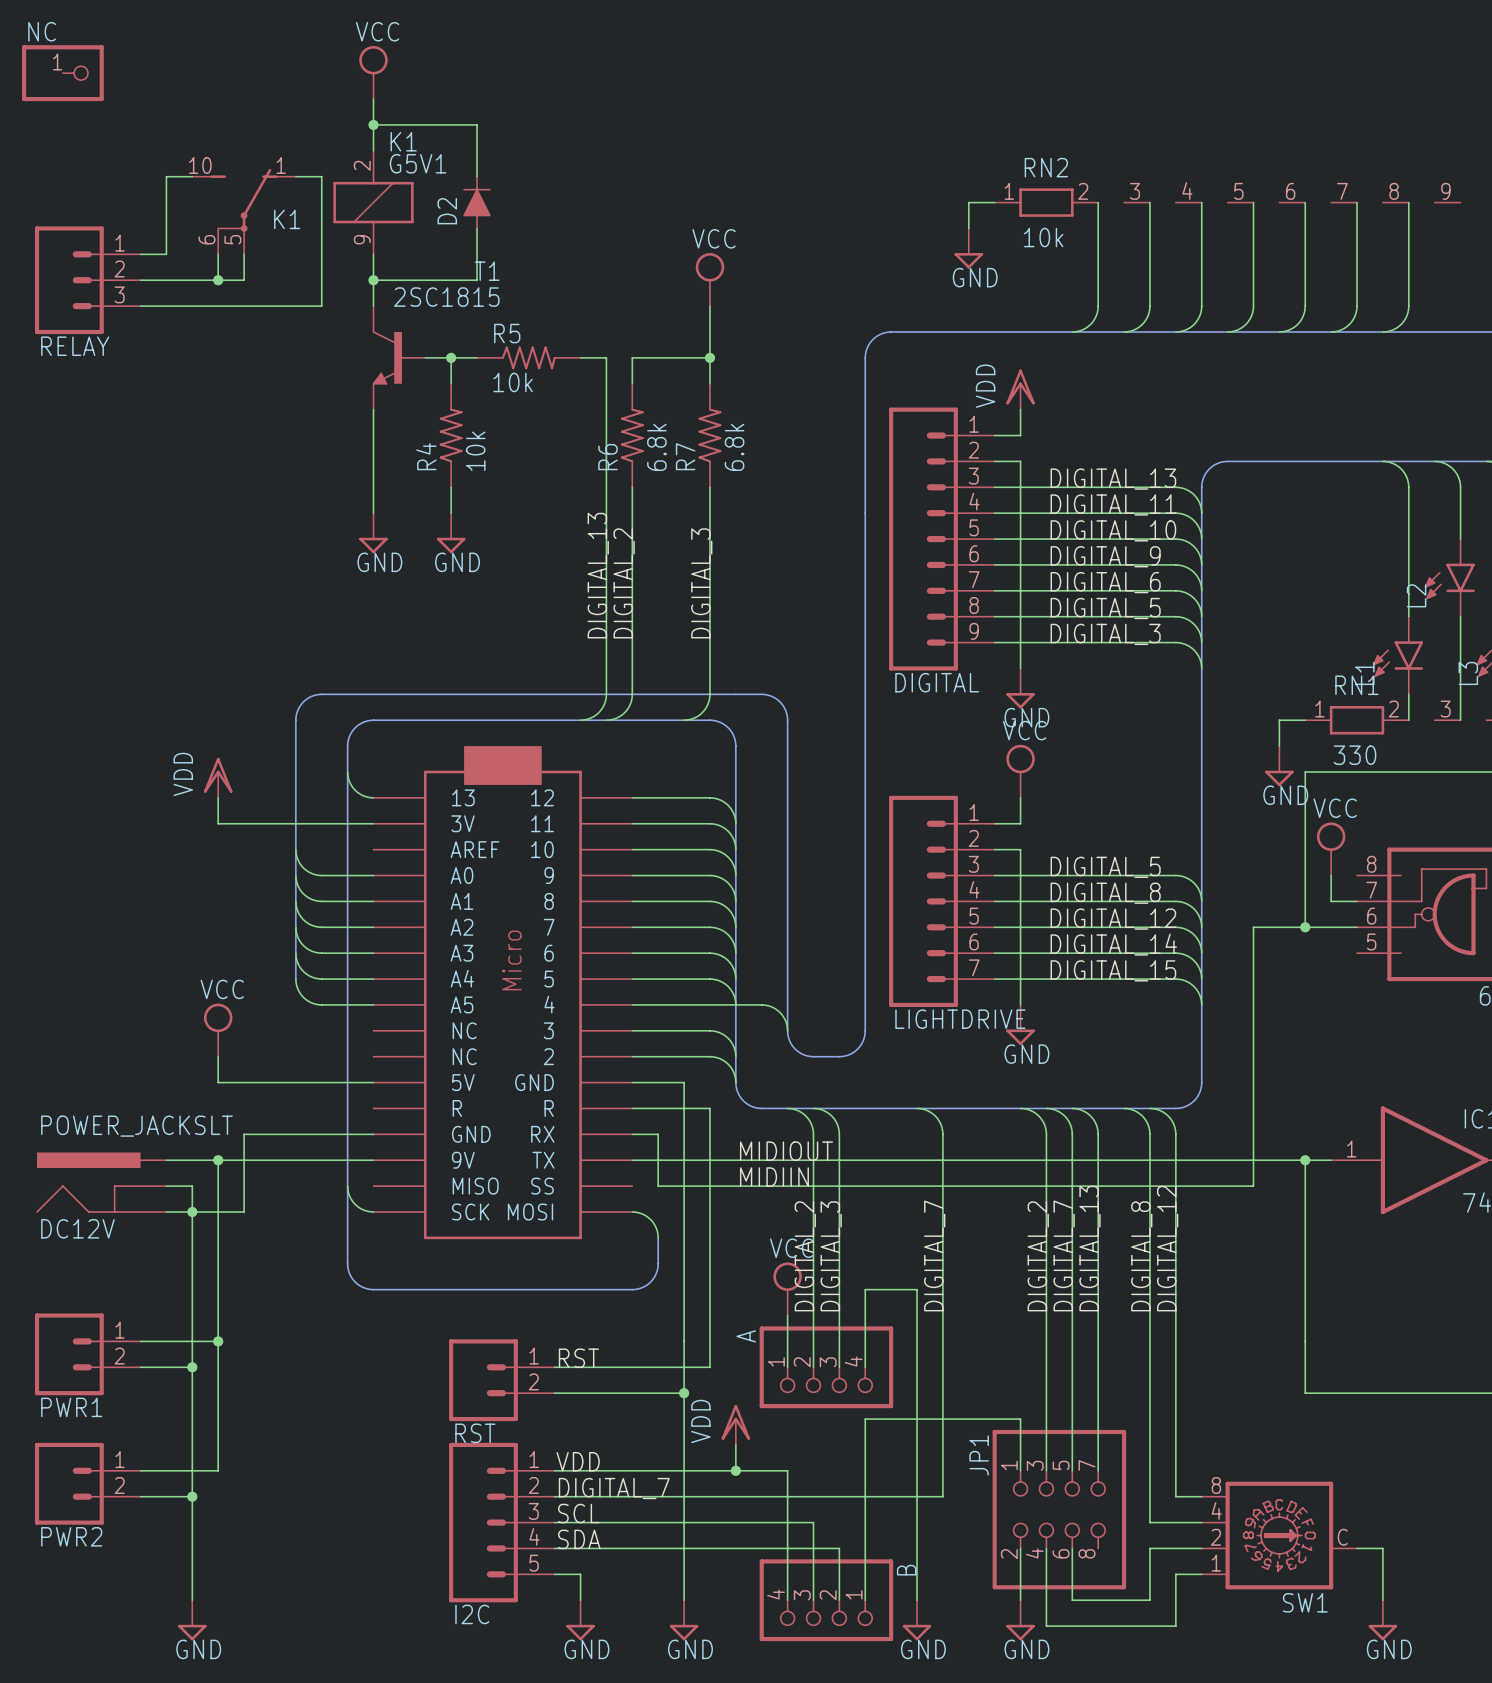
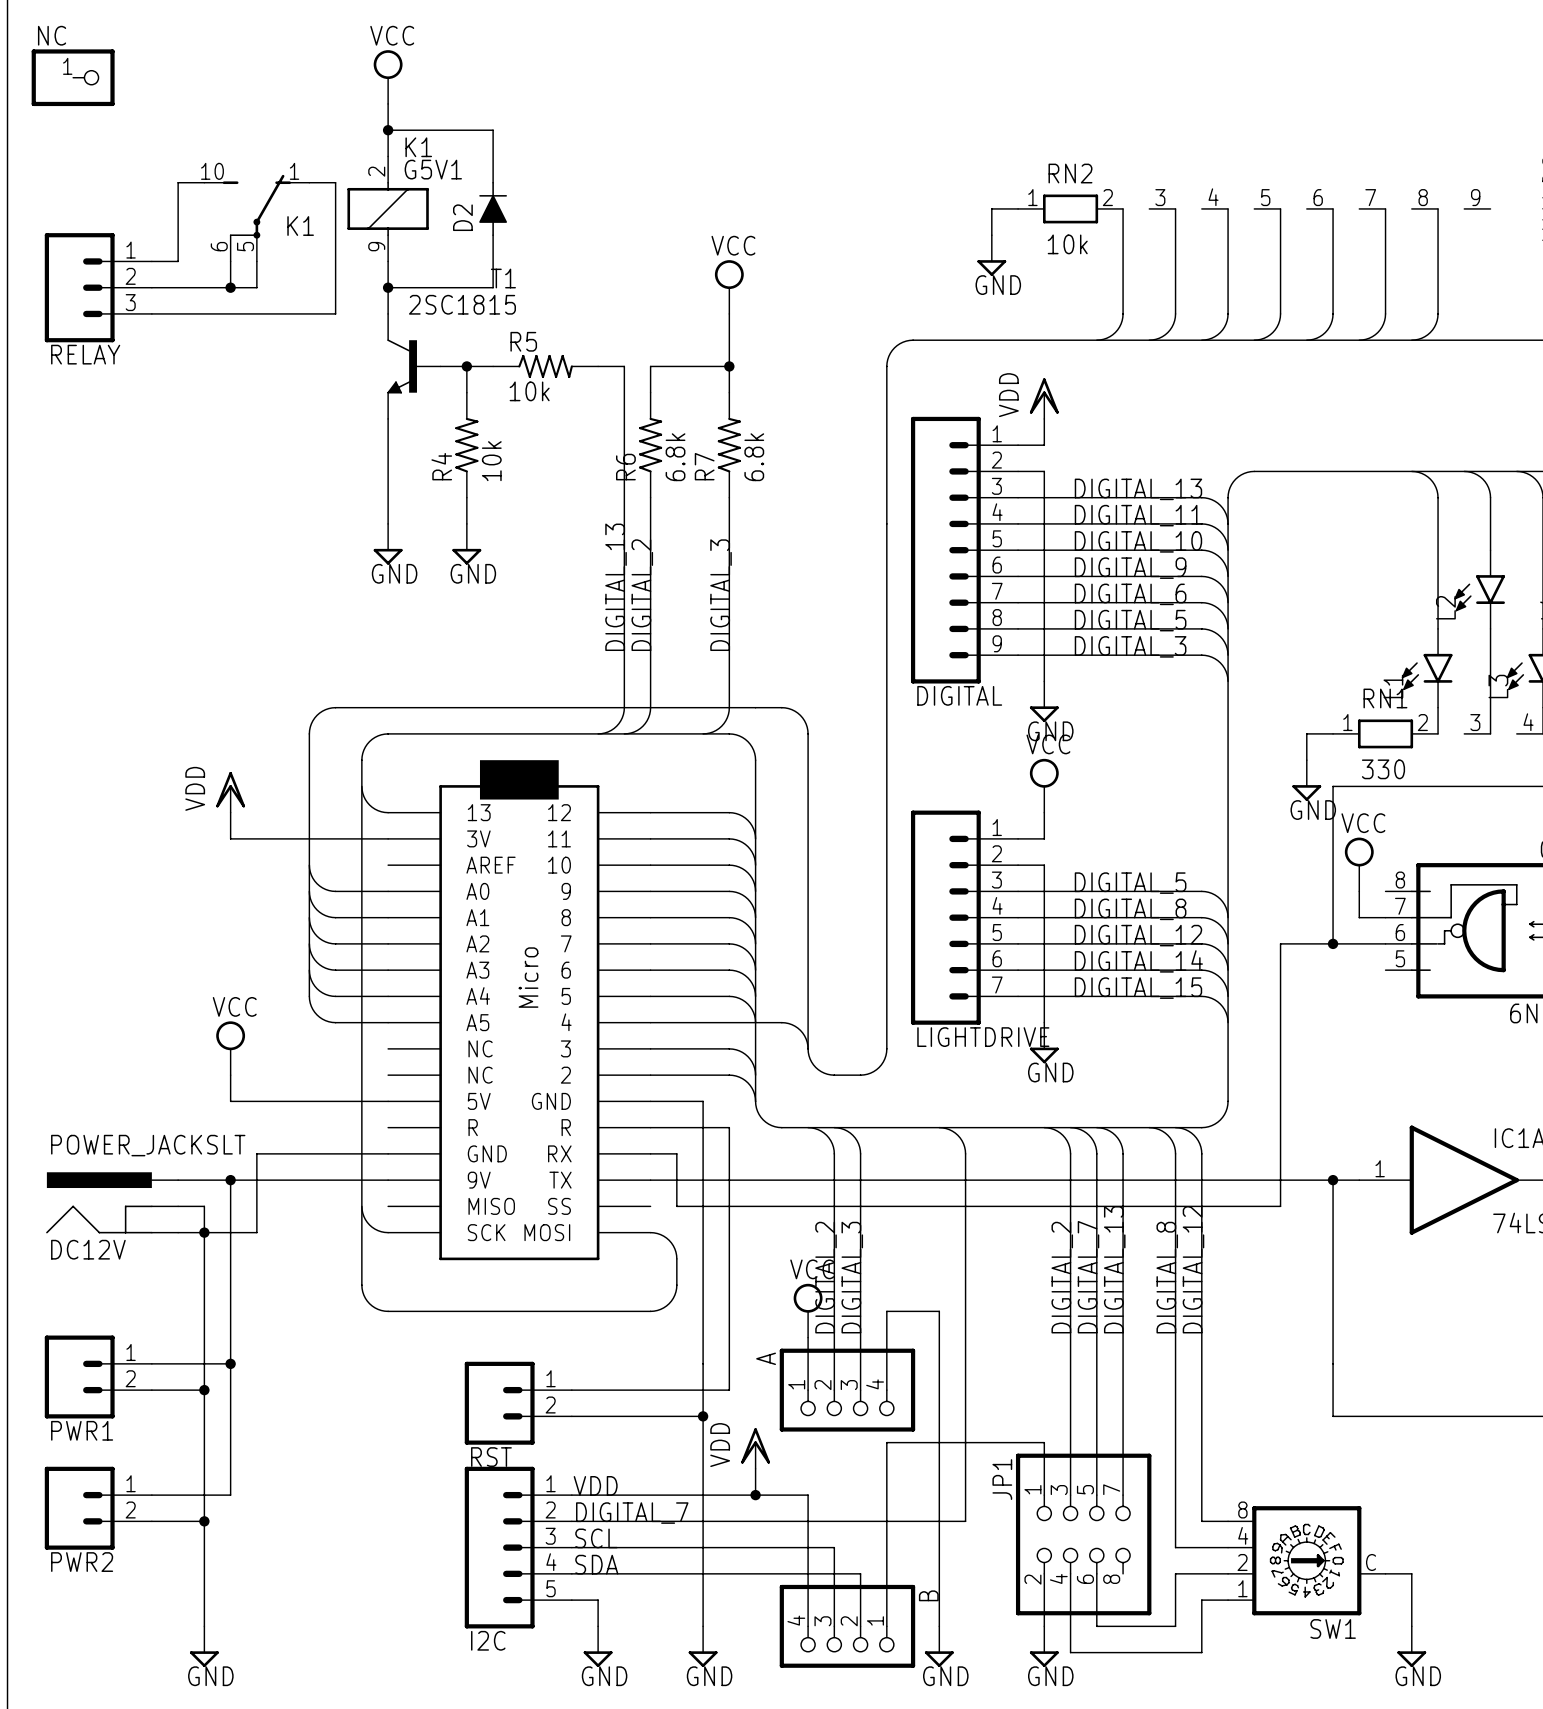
label: MIDIOUT (786, 1151) -> none
label: MIDIIN (774, 1177) -> none
label: DIGITAL_7 (934, 1255) -> none
label: RST (578, 1358) -> none

